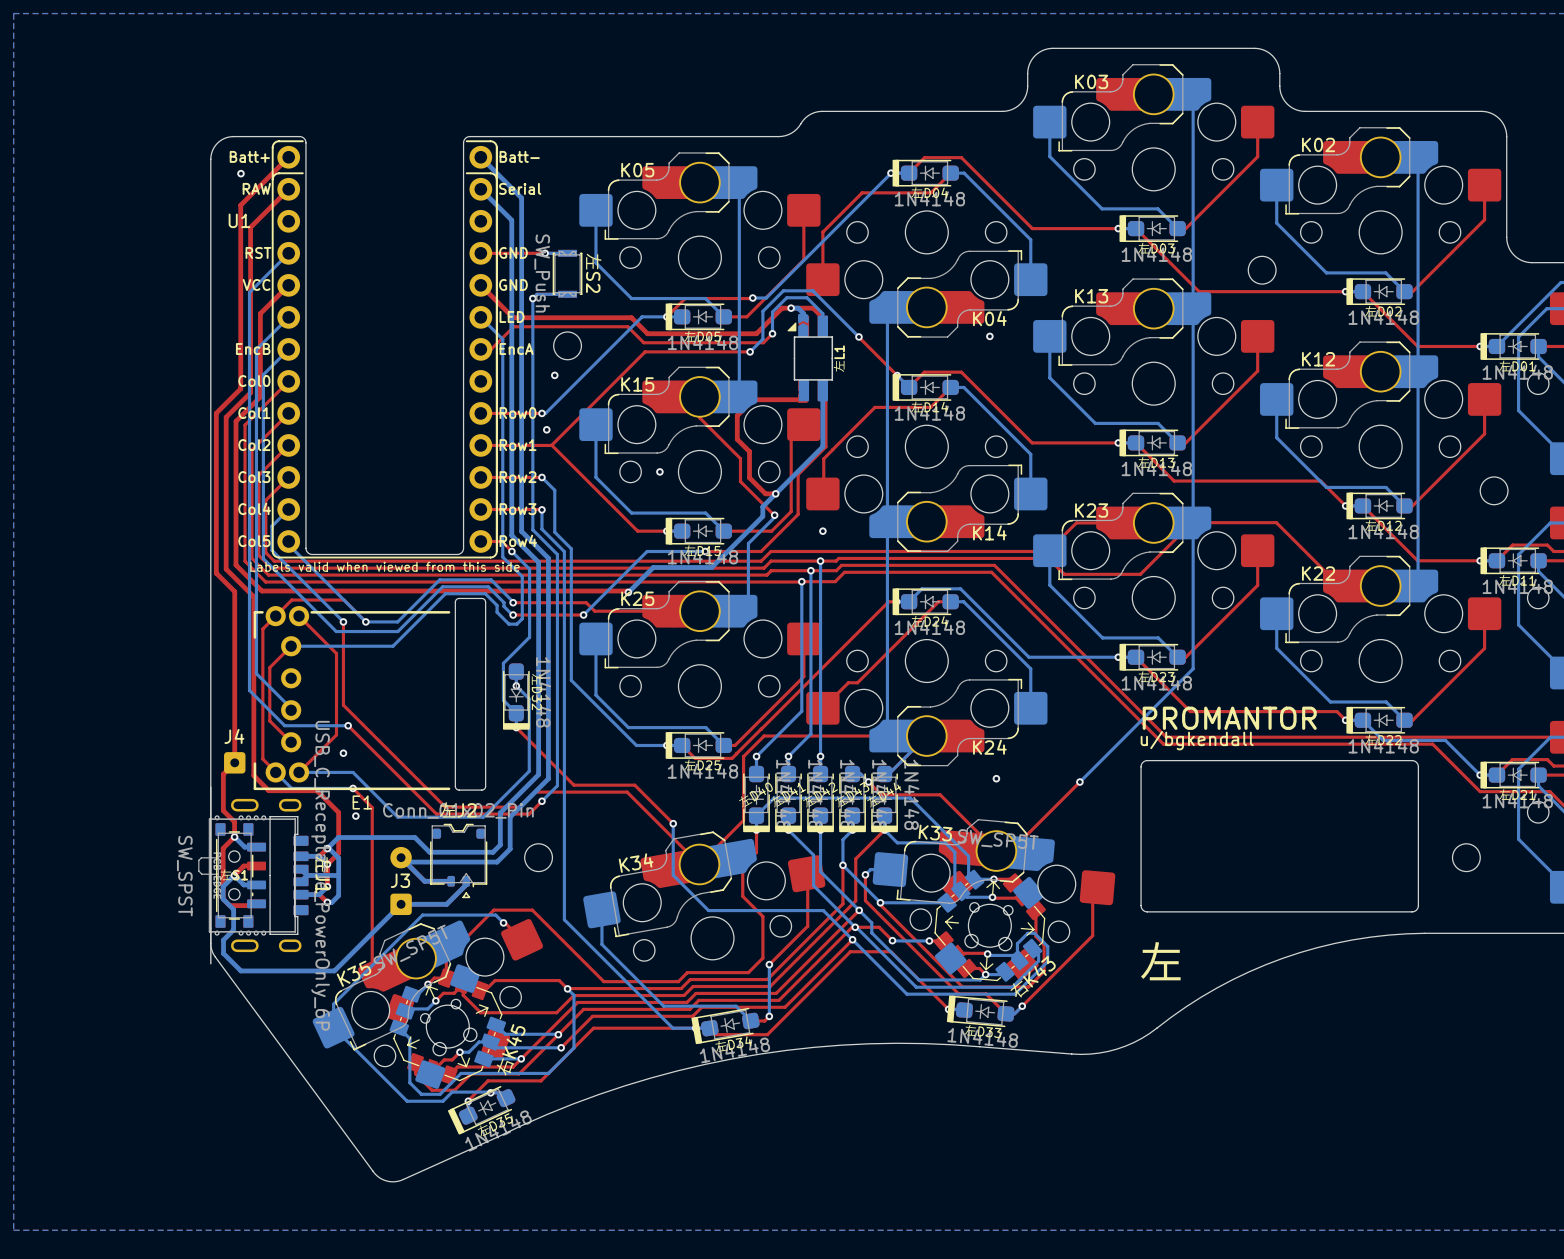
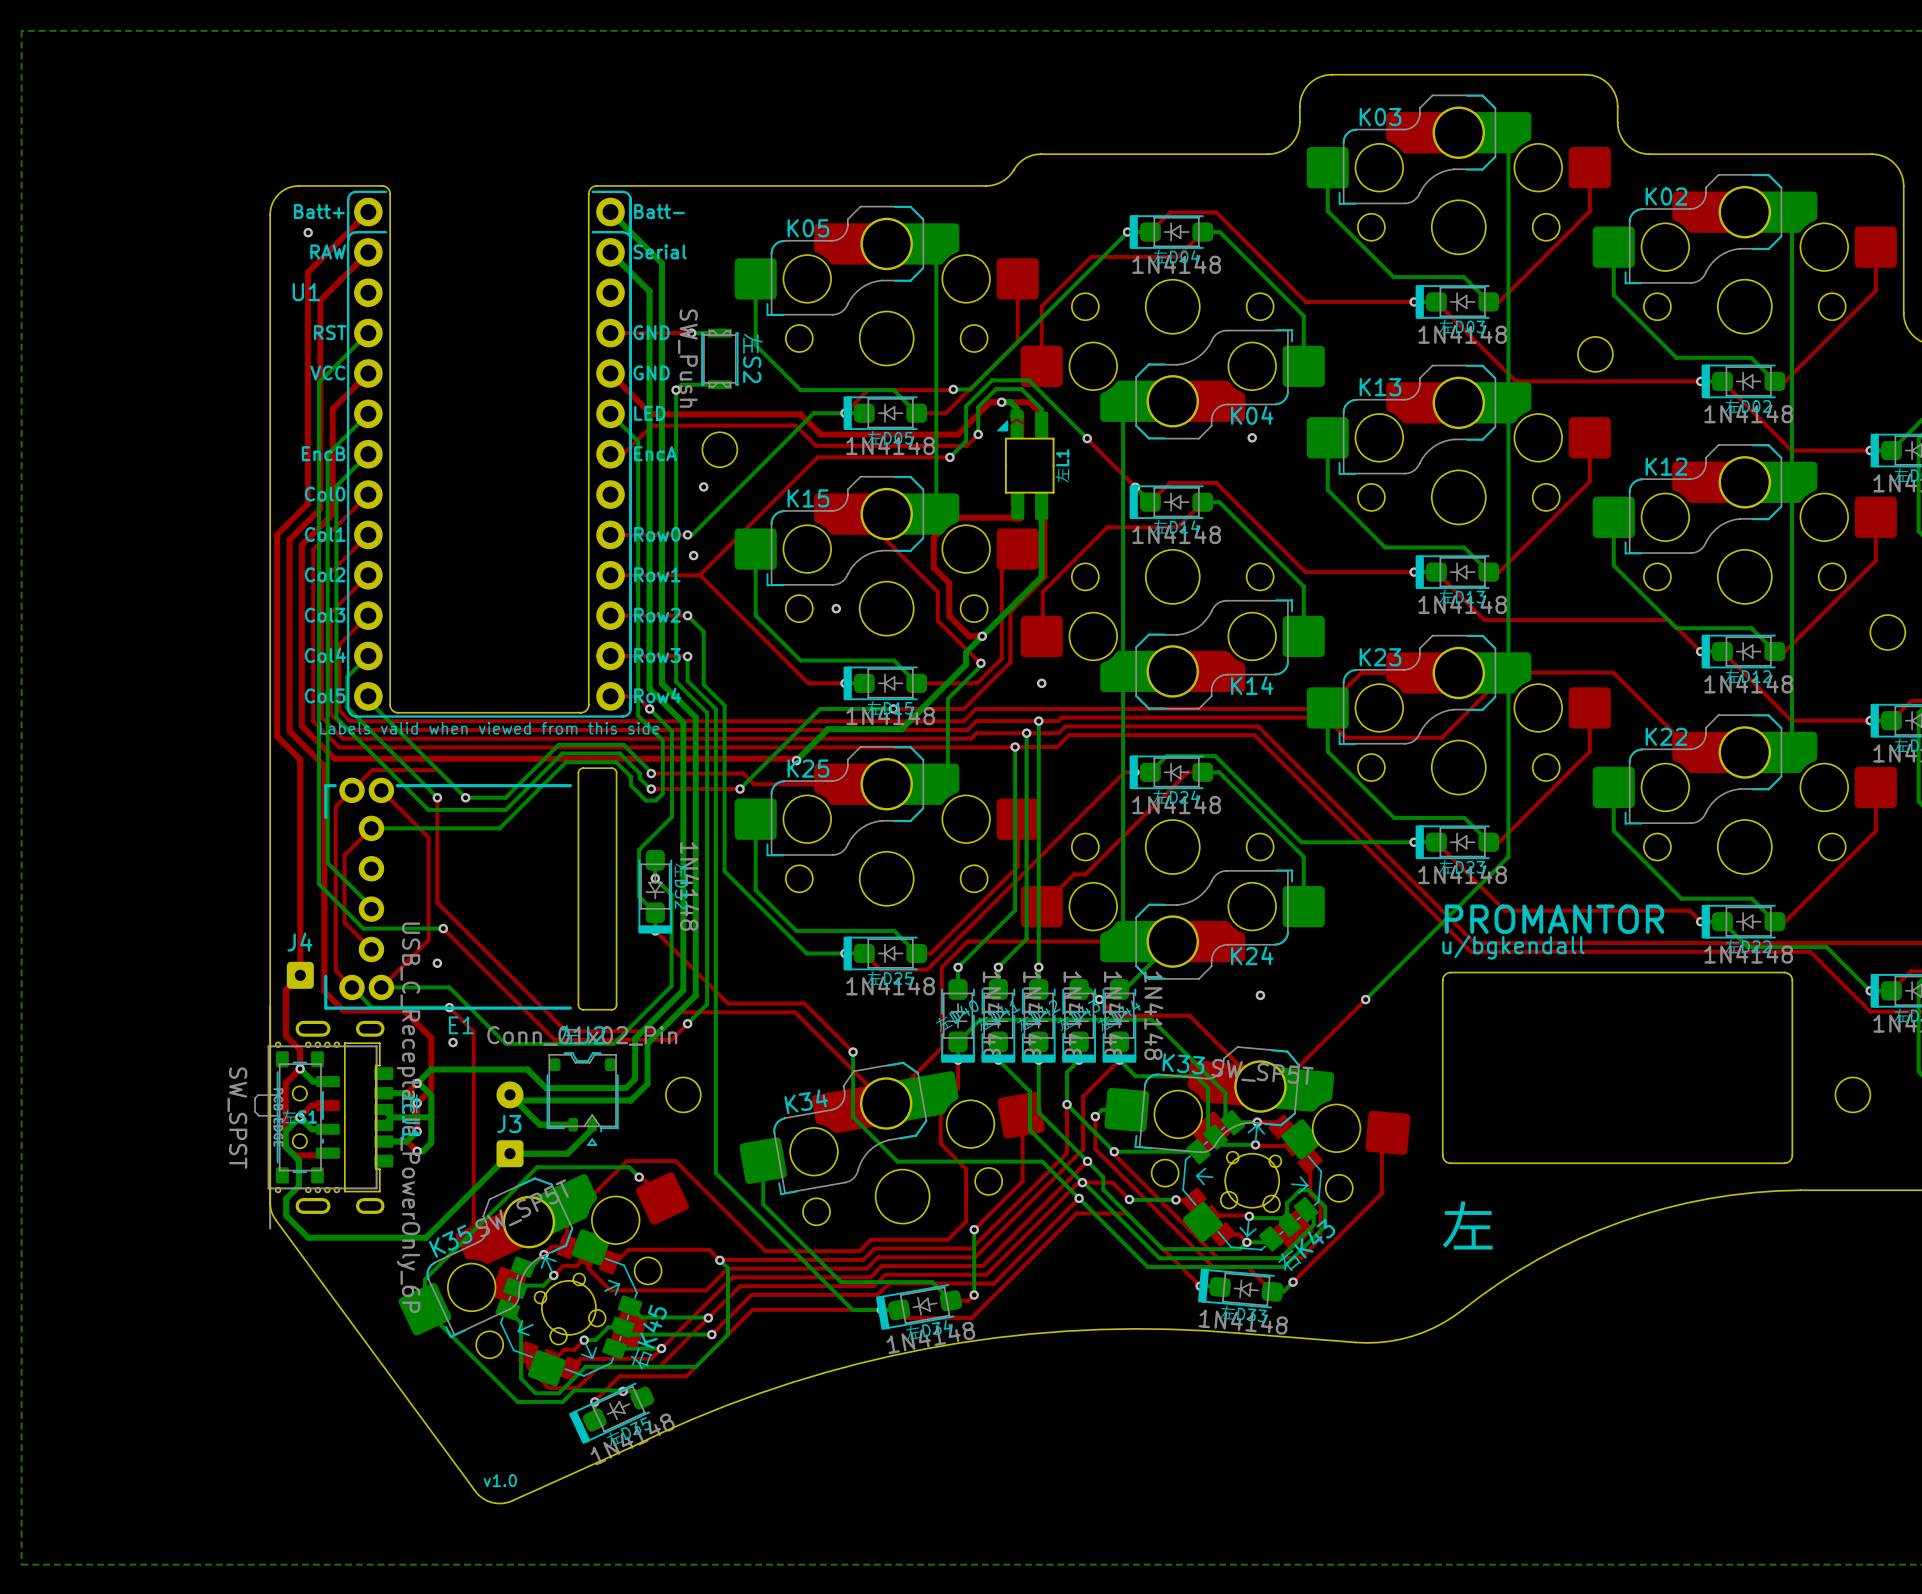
text: none -> v1.0 (500, 1480)

